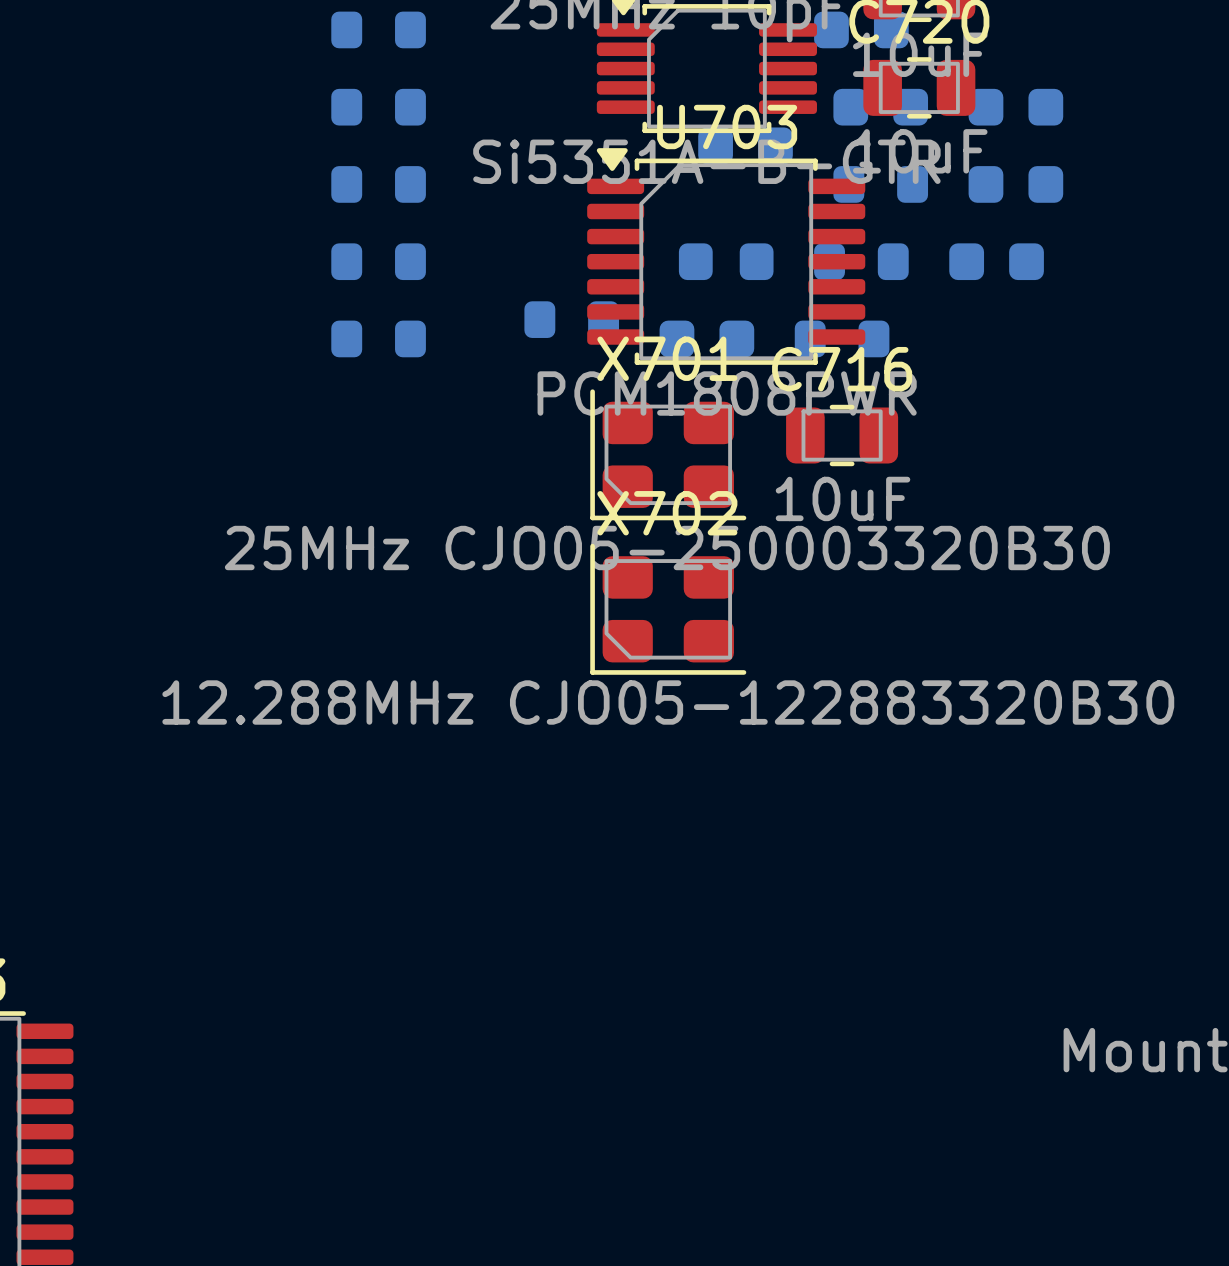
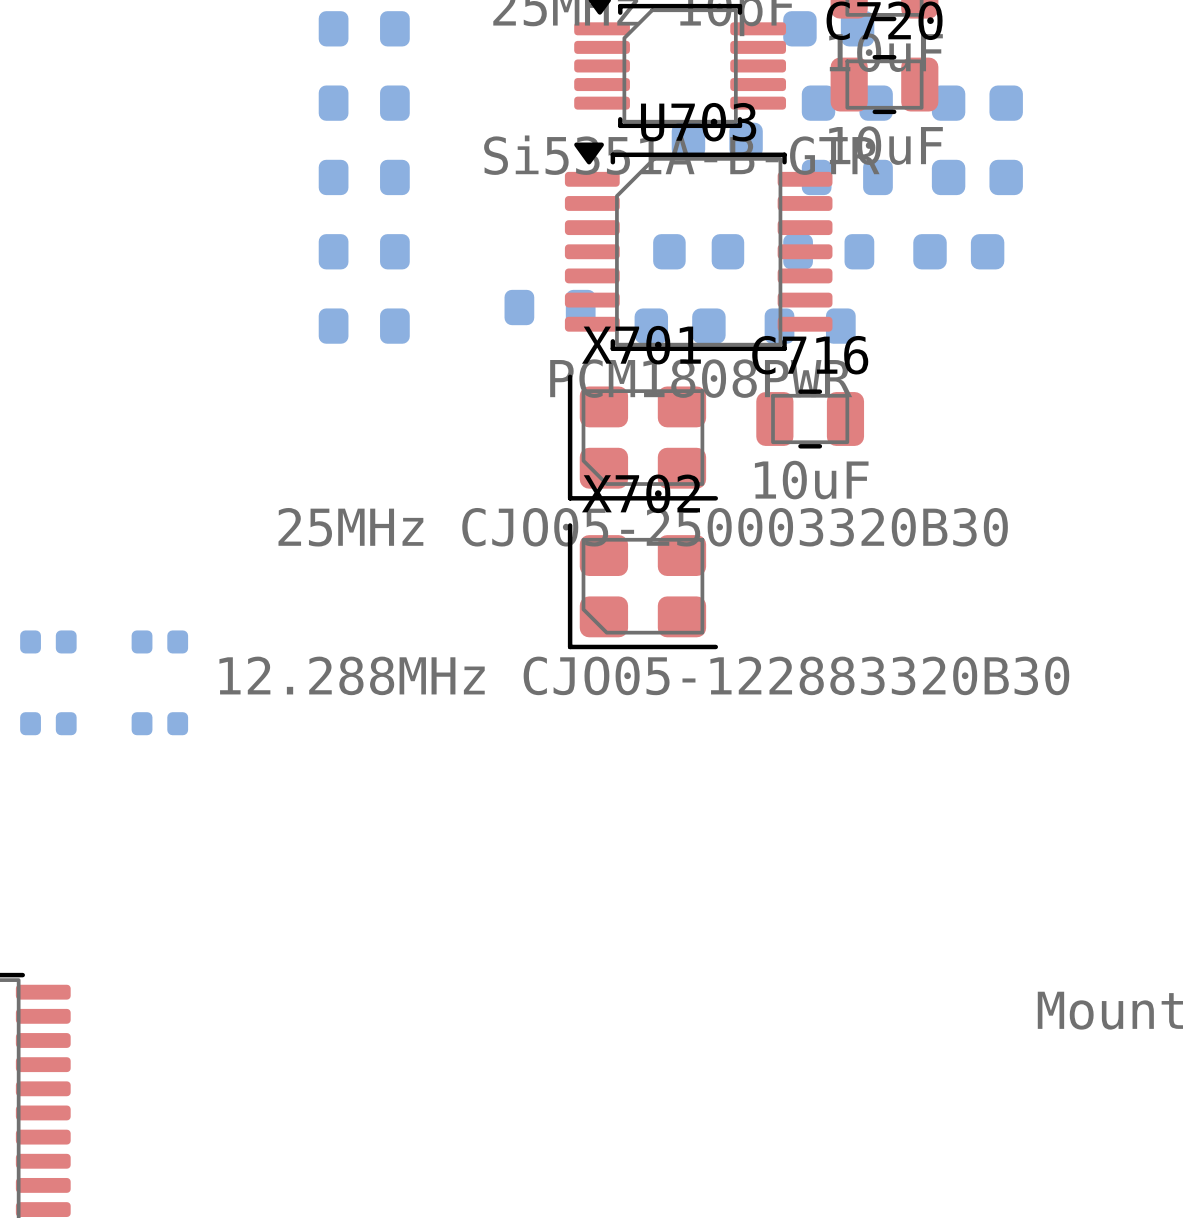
part: none -> (48, 641)
part: none -> (159, 641)
part: none -> (48, 723)
part: none -> (159, 723)

